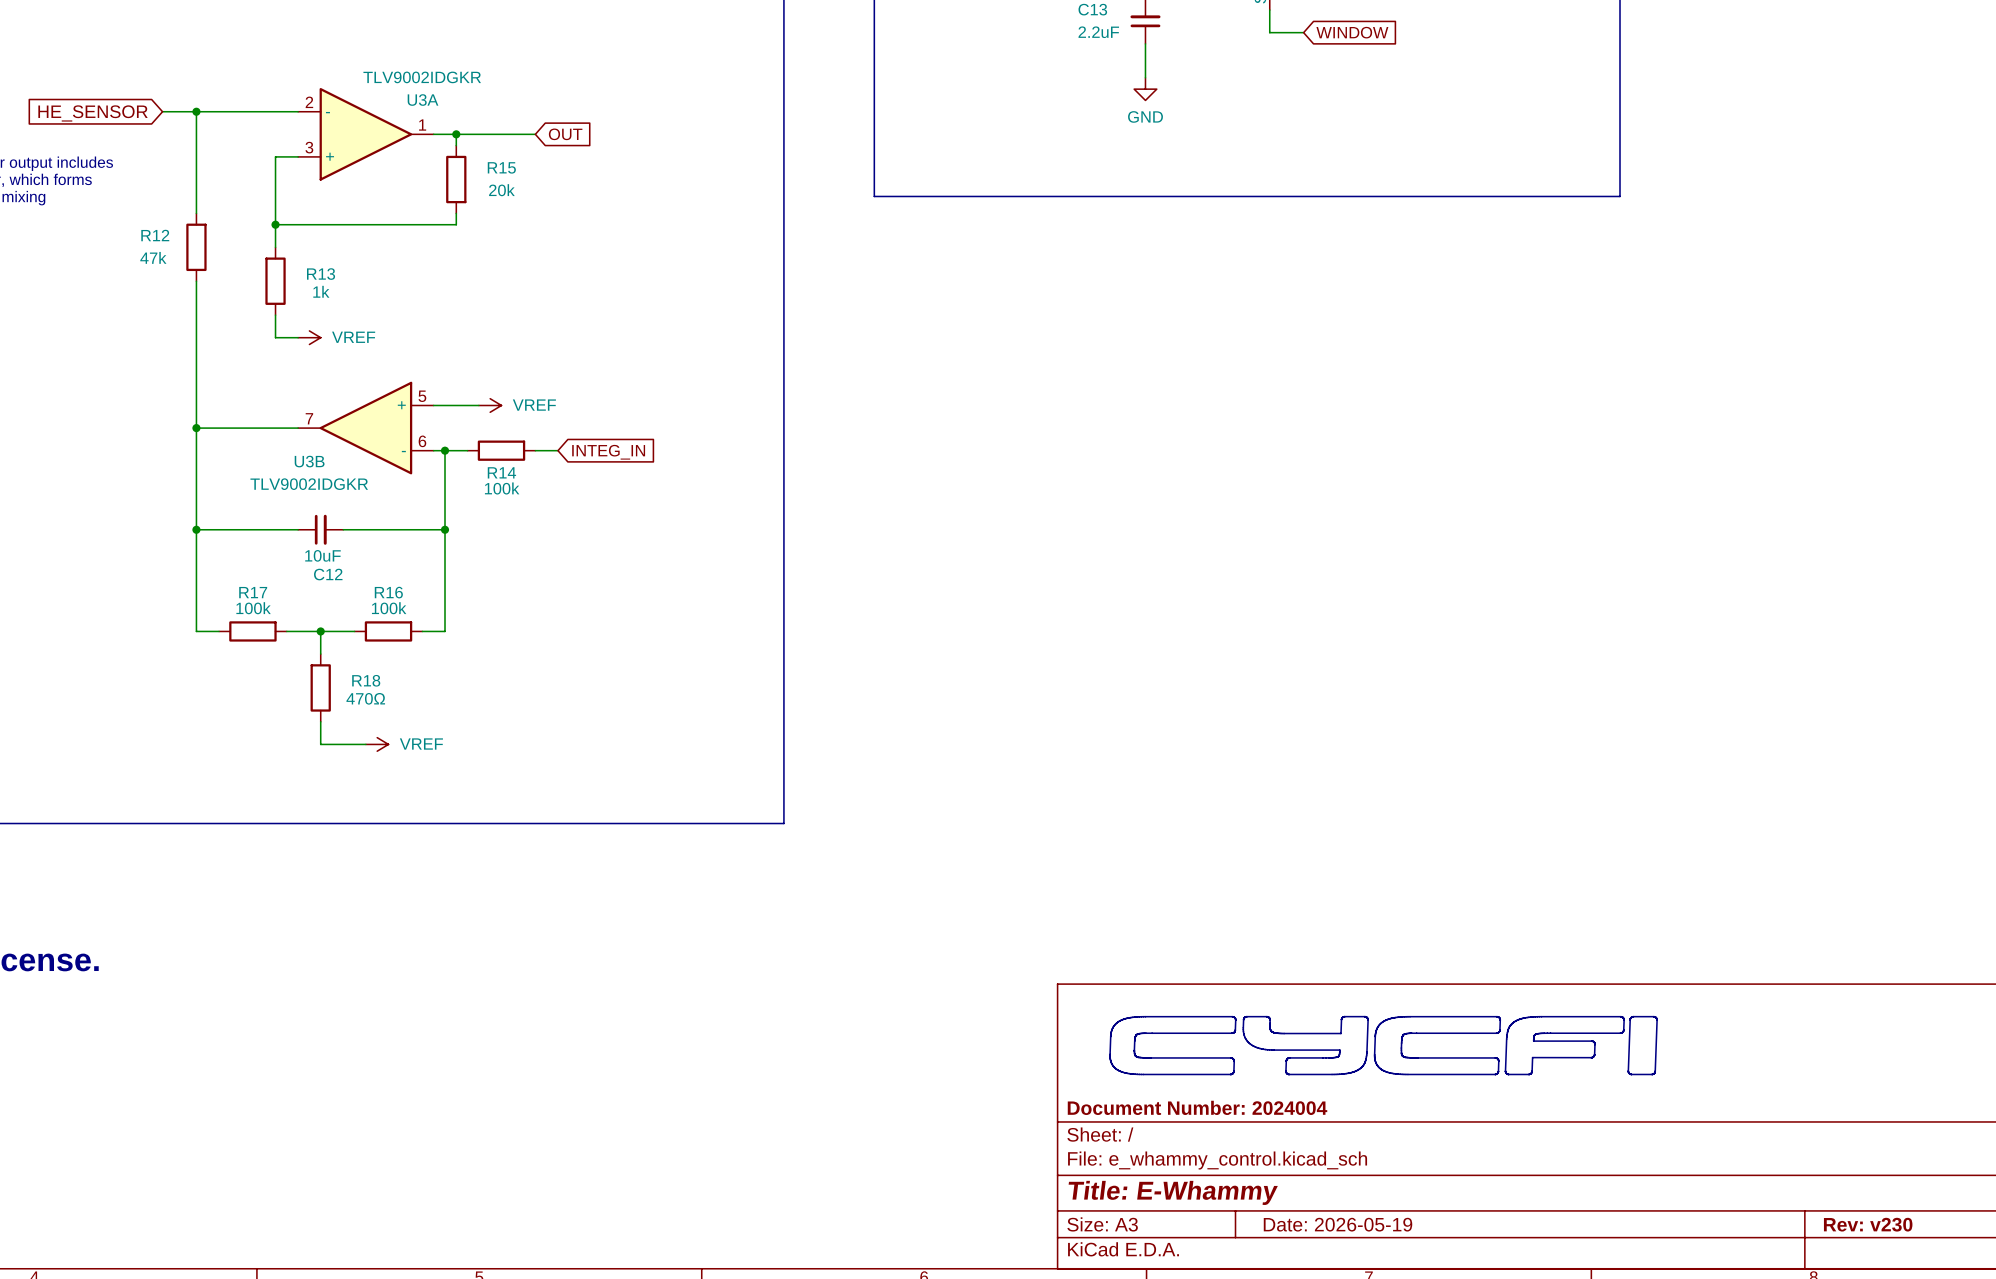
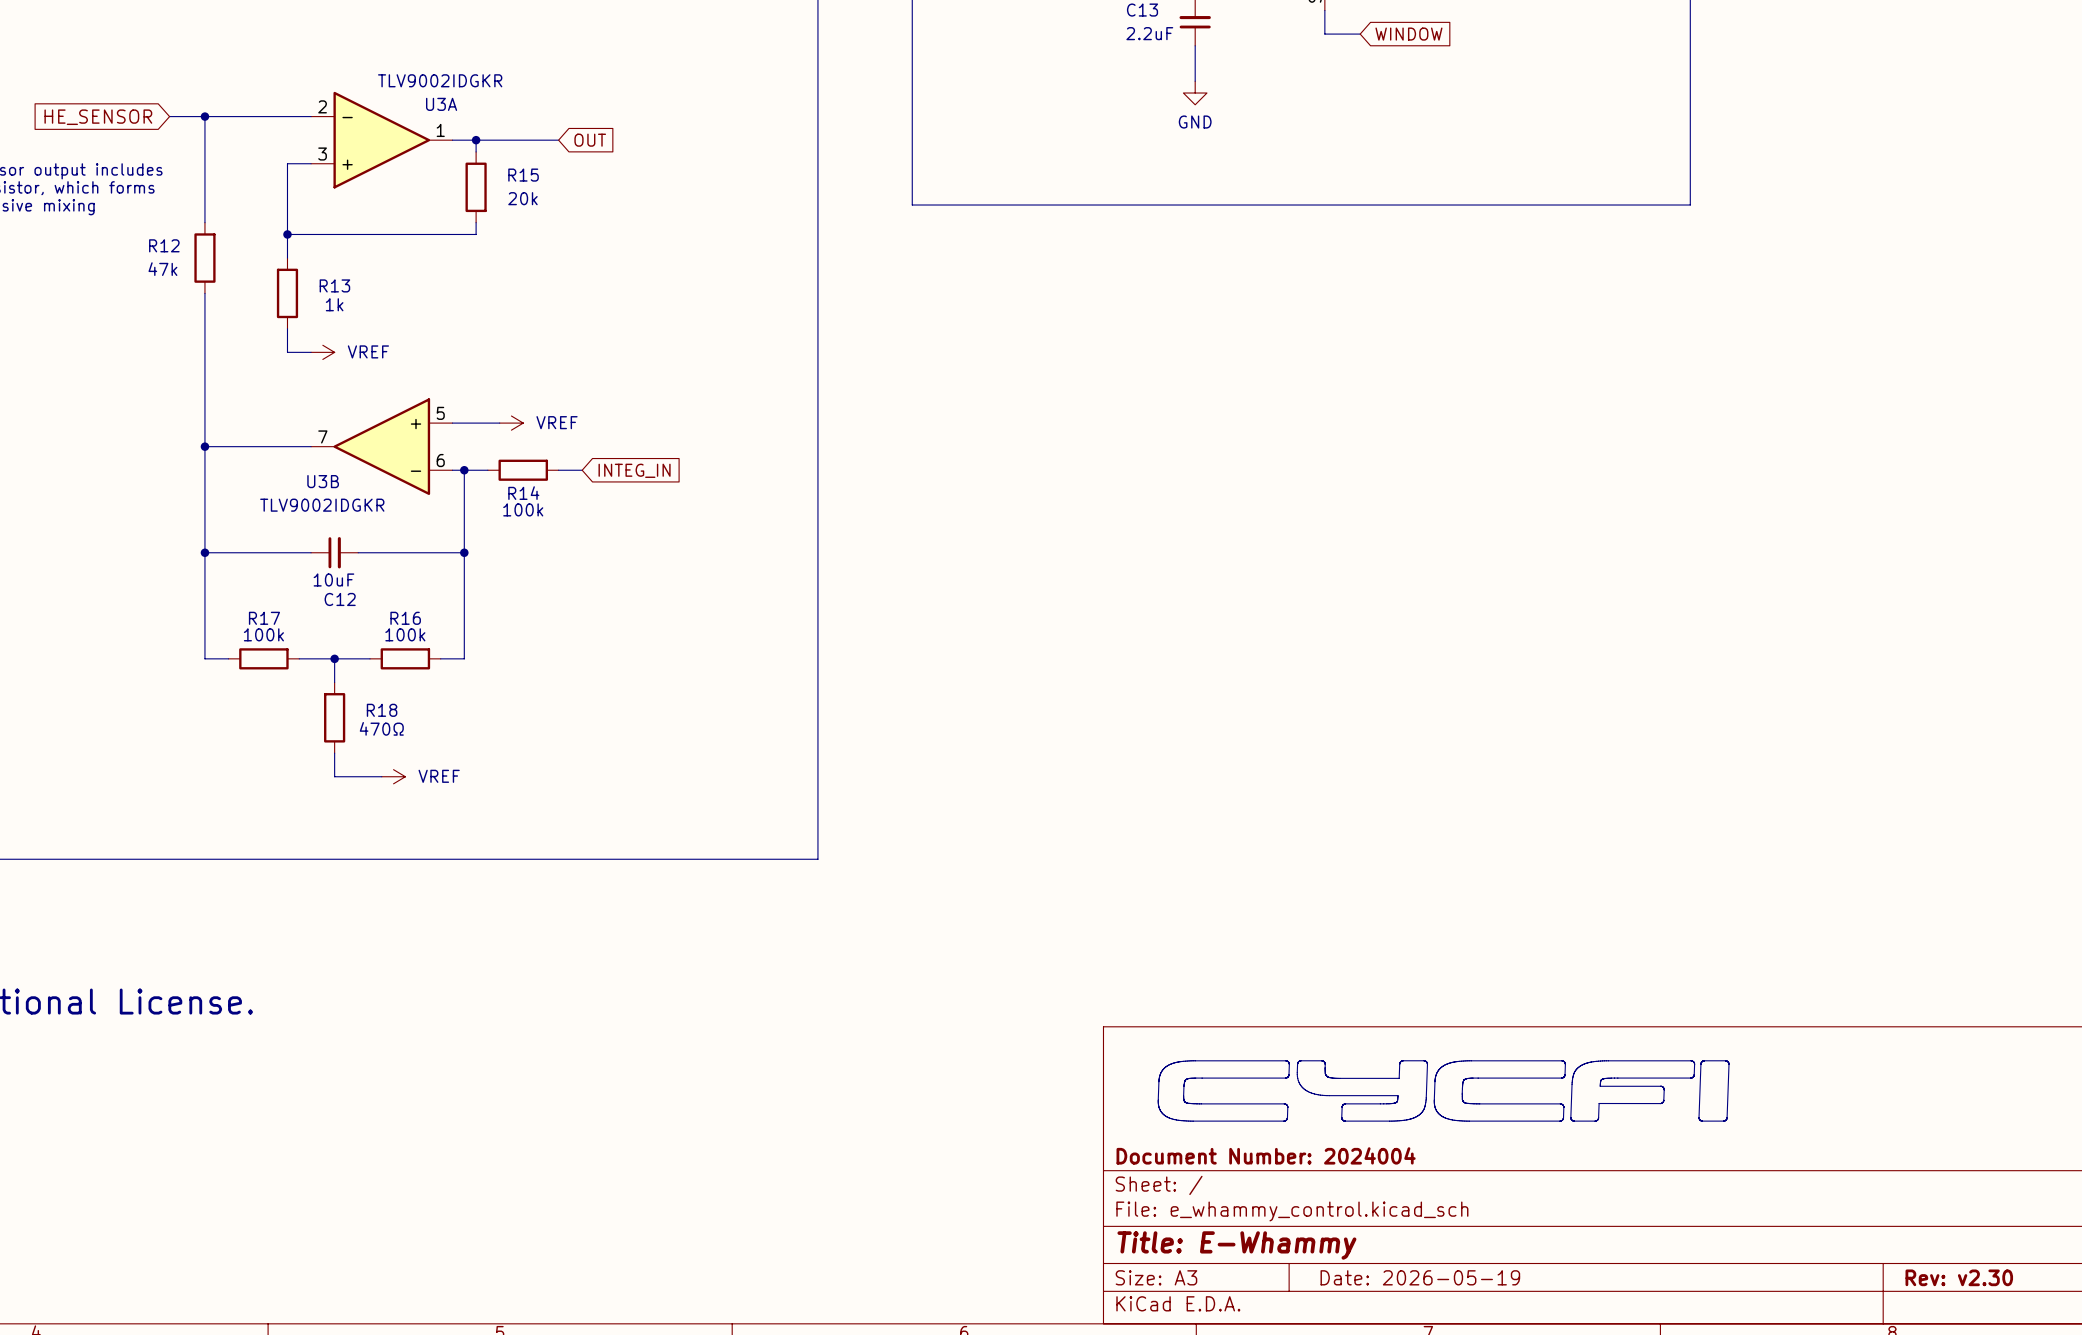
title block: Rev: v230 (1868, 1224) -> Rev: v2.30 (1959, 1277)

